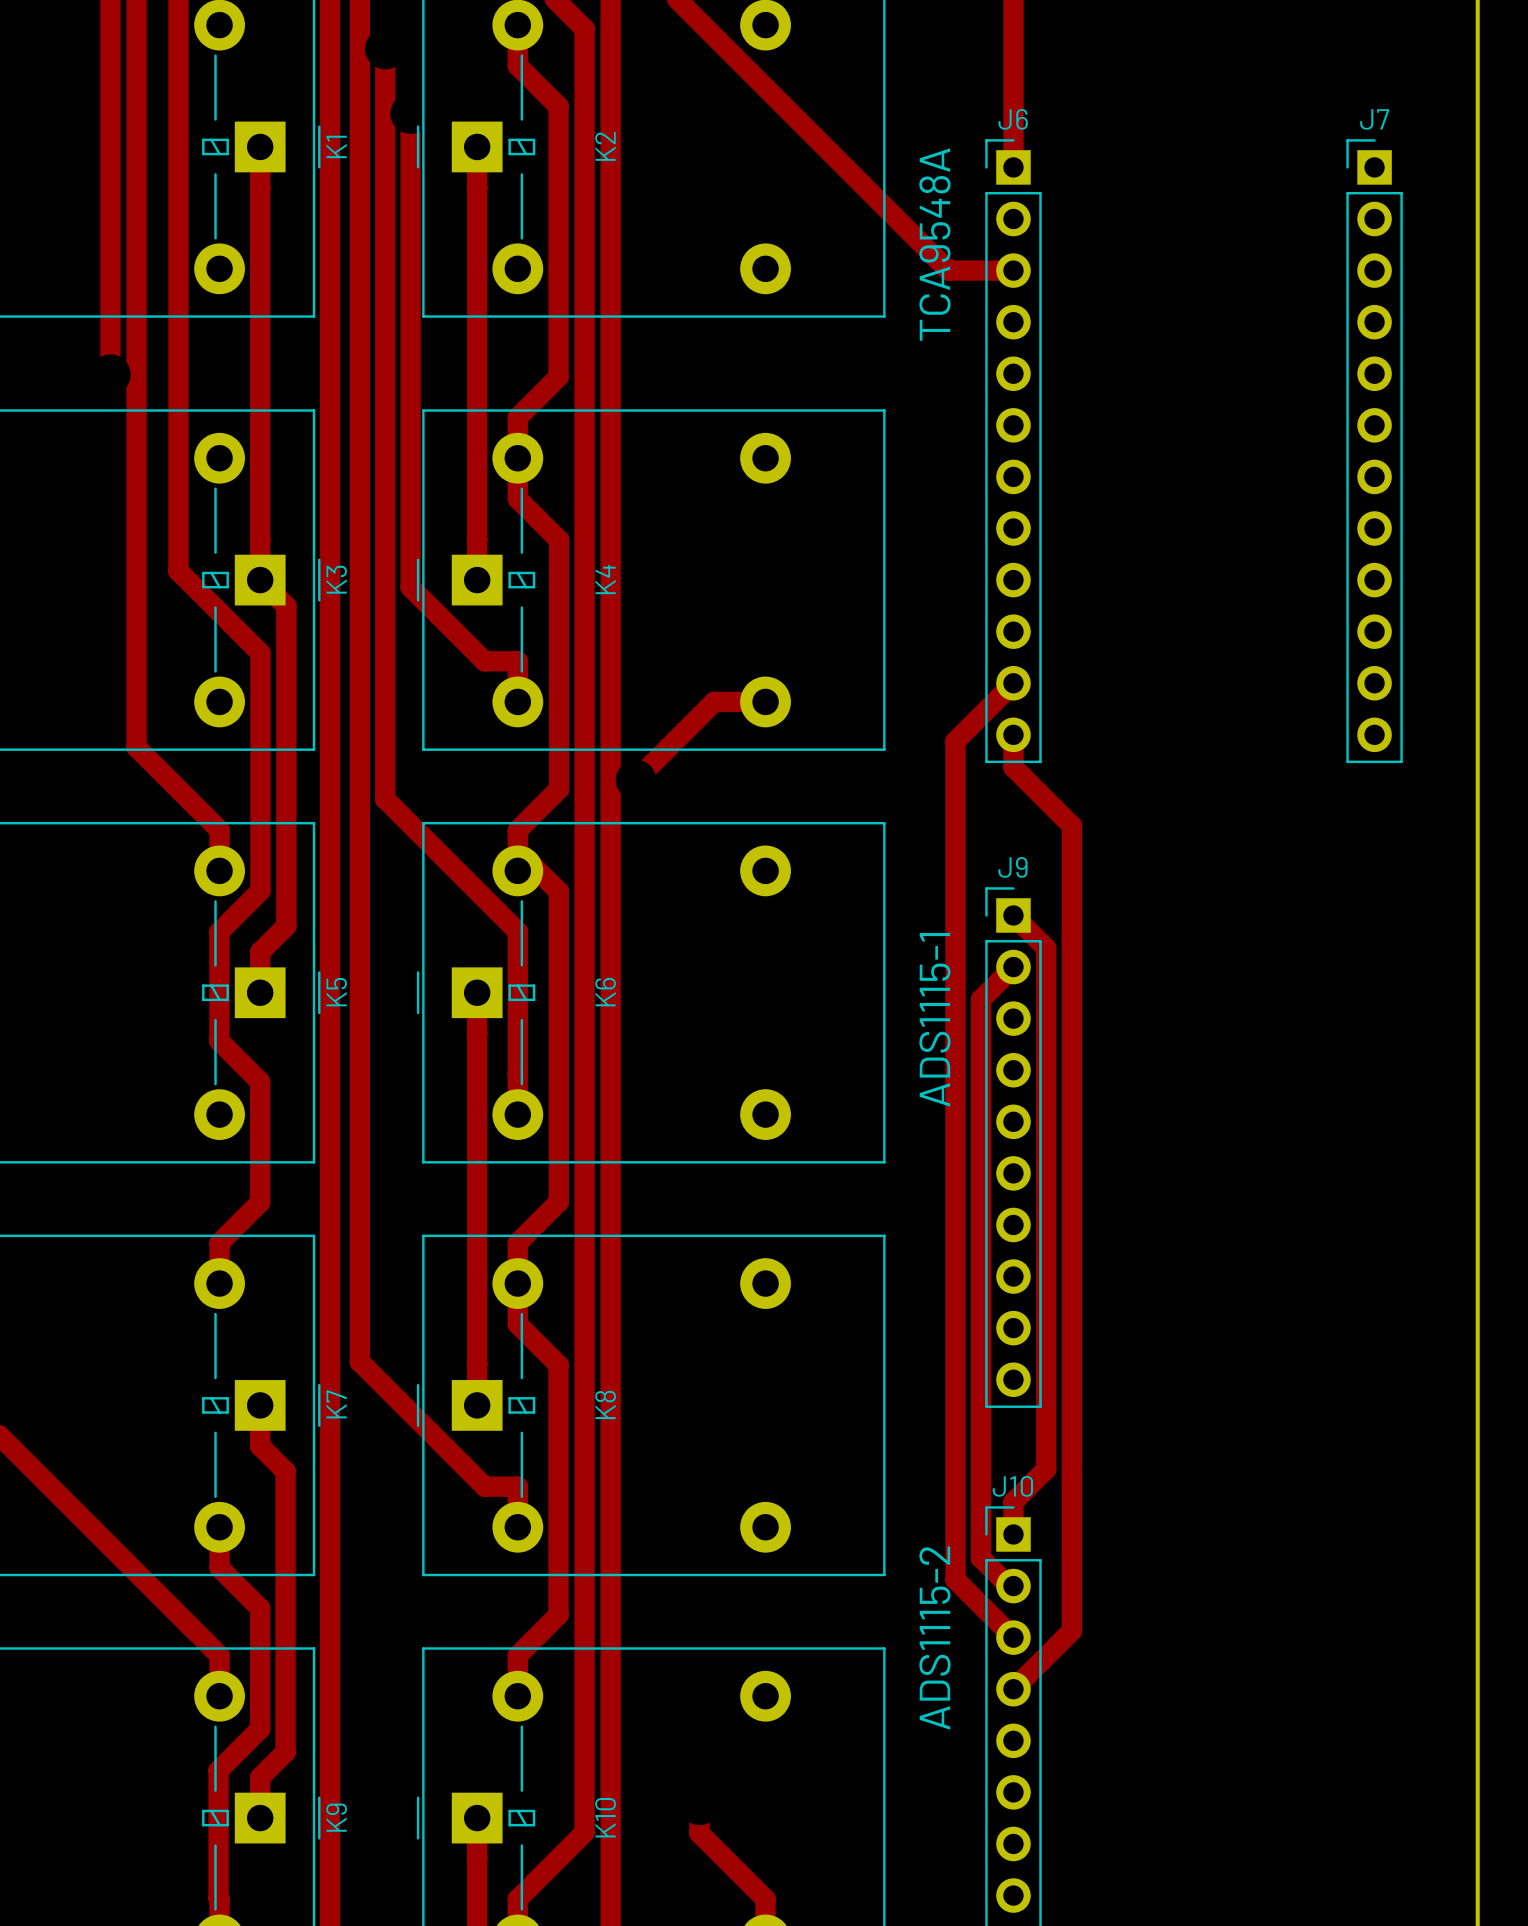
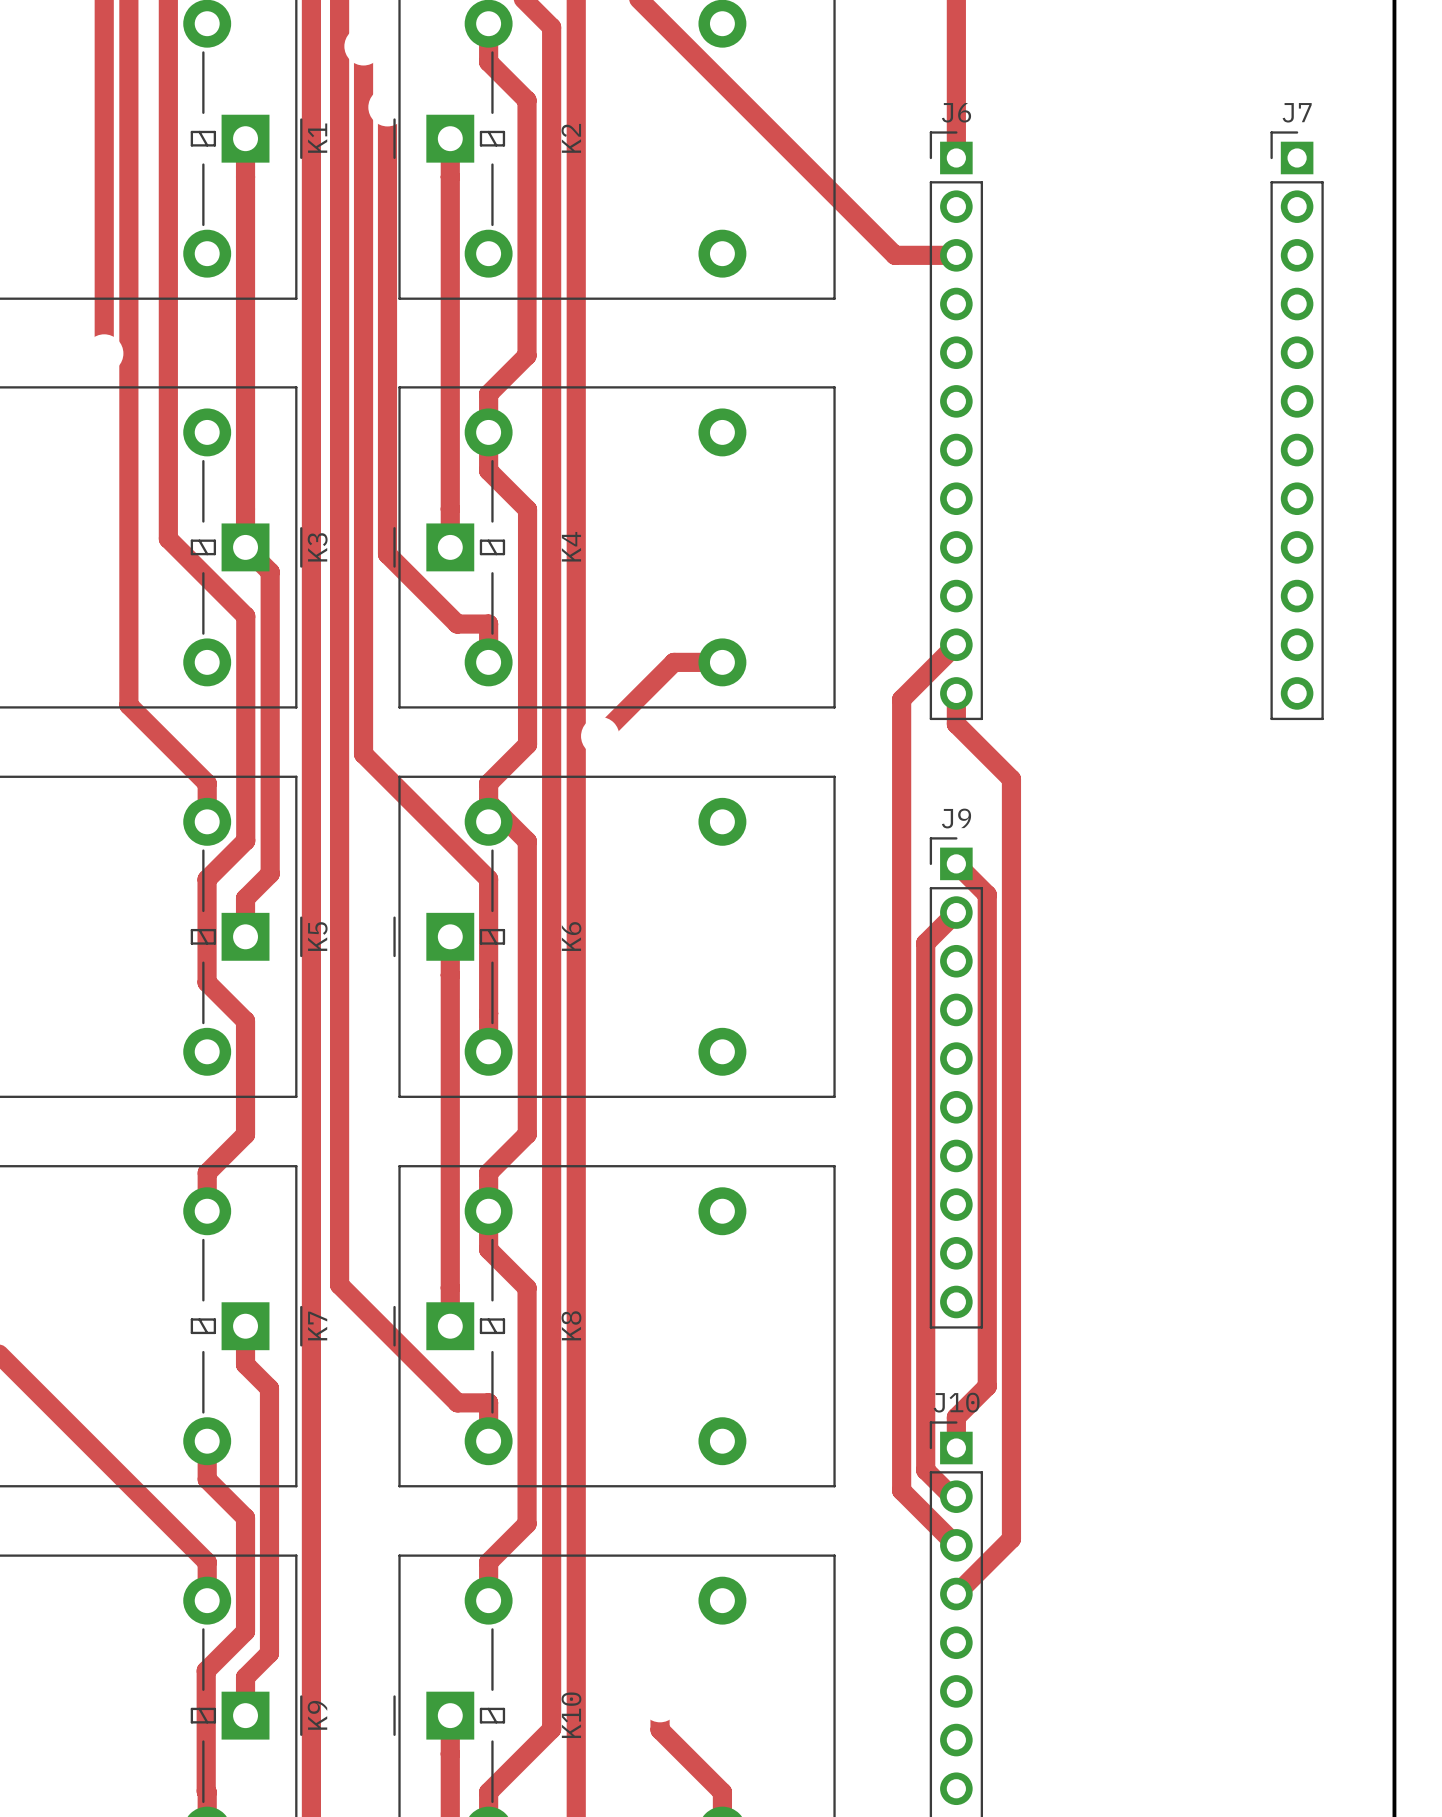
text: TCA9548A (934, 244) -> none
text: ADS1115-1 (934, 1019) -> none
text: ADS1115-2 (934, 1638) -> none

